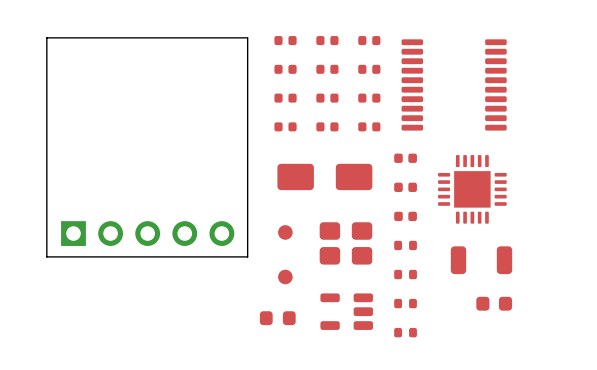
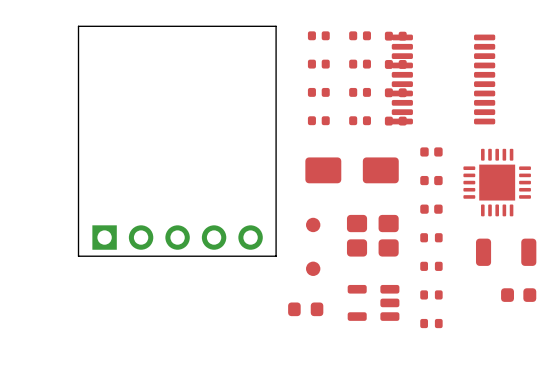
board edge: (247, 37) (46, 37) (46, 256) (247, 256) (247, 37) -> (276, 26) (276, 256) (78, 256) (78, 26) (276, 26)
part: (285, 40) -> none
part: none -> (395, 36)
part: (285, 69) -> none
part: none -> (395, 64)
part: (285, 98) -> none
part: none -> (395, 92)
part: (285, 126) -> none
part: none -> (395, 121)
part: (405, 158) -> none
part: none -> (431, 151)
part position: (324, 176) -> (352, 170)
part: (405, 187) -> none
part: none -> (431, 180)
part position: (472, 189) -> (497, 182)
part: (405, 216) -> none
part: none -> (431, 209)
part: (285, 232) -> none
part: none -> (313, 224)
part position: (147, 233) -> (177, 237)
part position: (345, 243) -> (372, 235)
part: (405, 245) -> none
part: none -> (431, 237)
part position: (481, 260) -> (506, 252)
part: (405, 274) -> none
part: none -> (431, 266)
part: (285, 276) -> none
part: none -> (313, 268)
part: (405, 303) -> none
part: none -> (431, 294)
part position: (494, 303) -> (518, 295)
part position: (346, 311) -> (373, 302)
part position: (277, 318) -> (305, 309)
part: (405, 332) -> none
part: none -> (431, 323)

